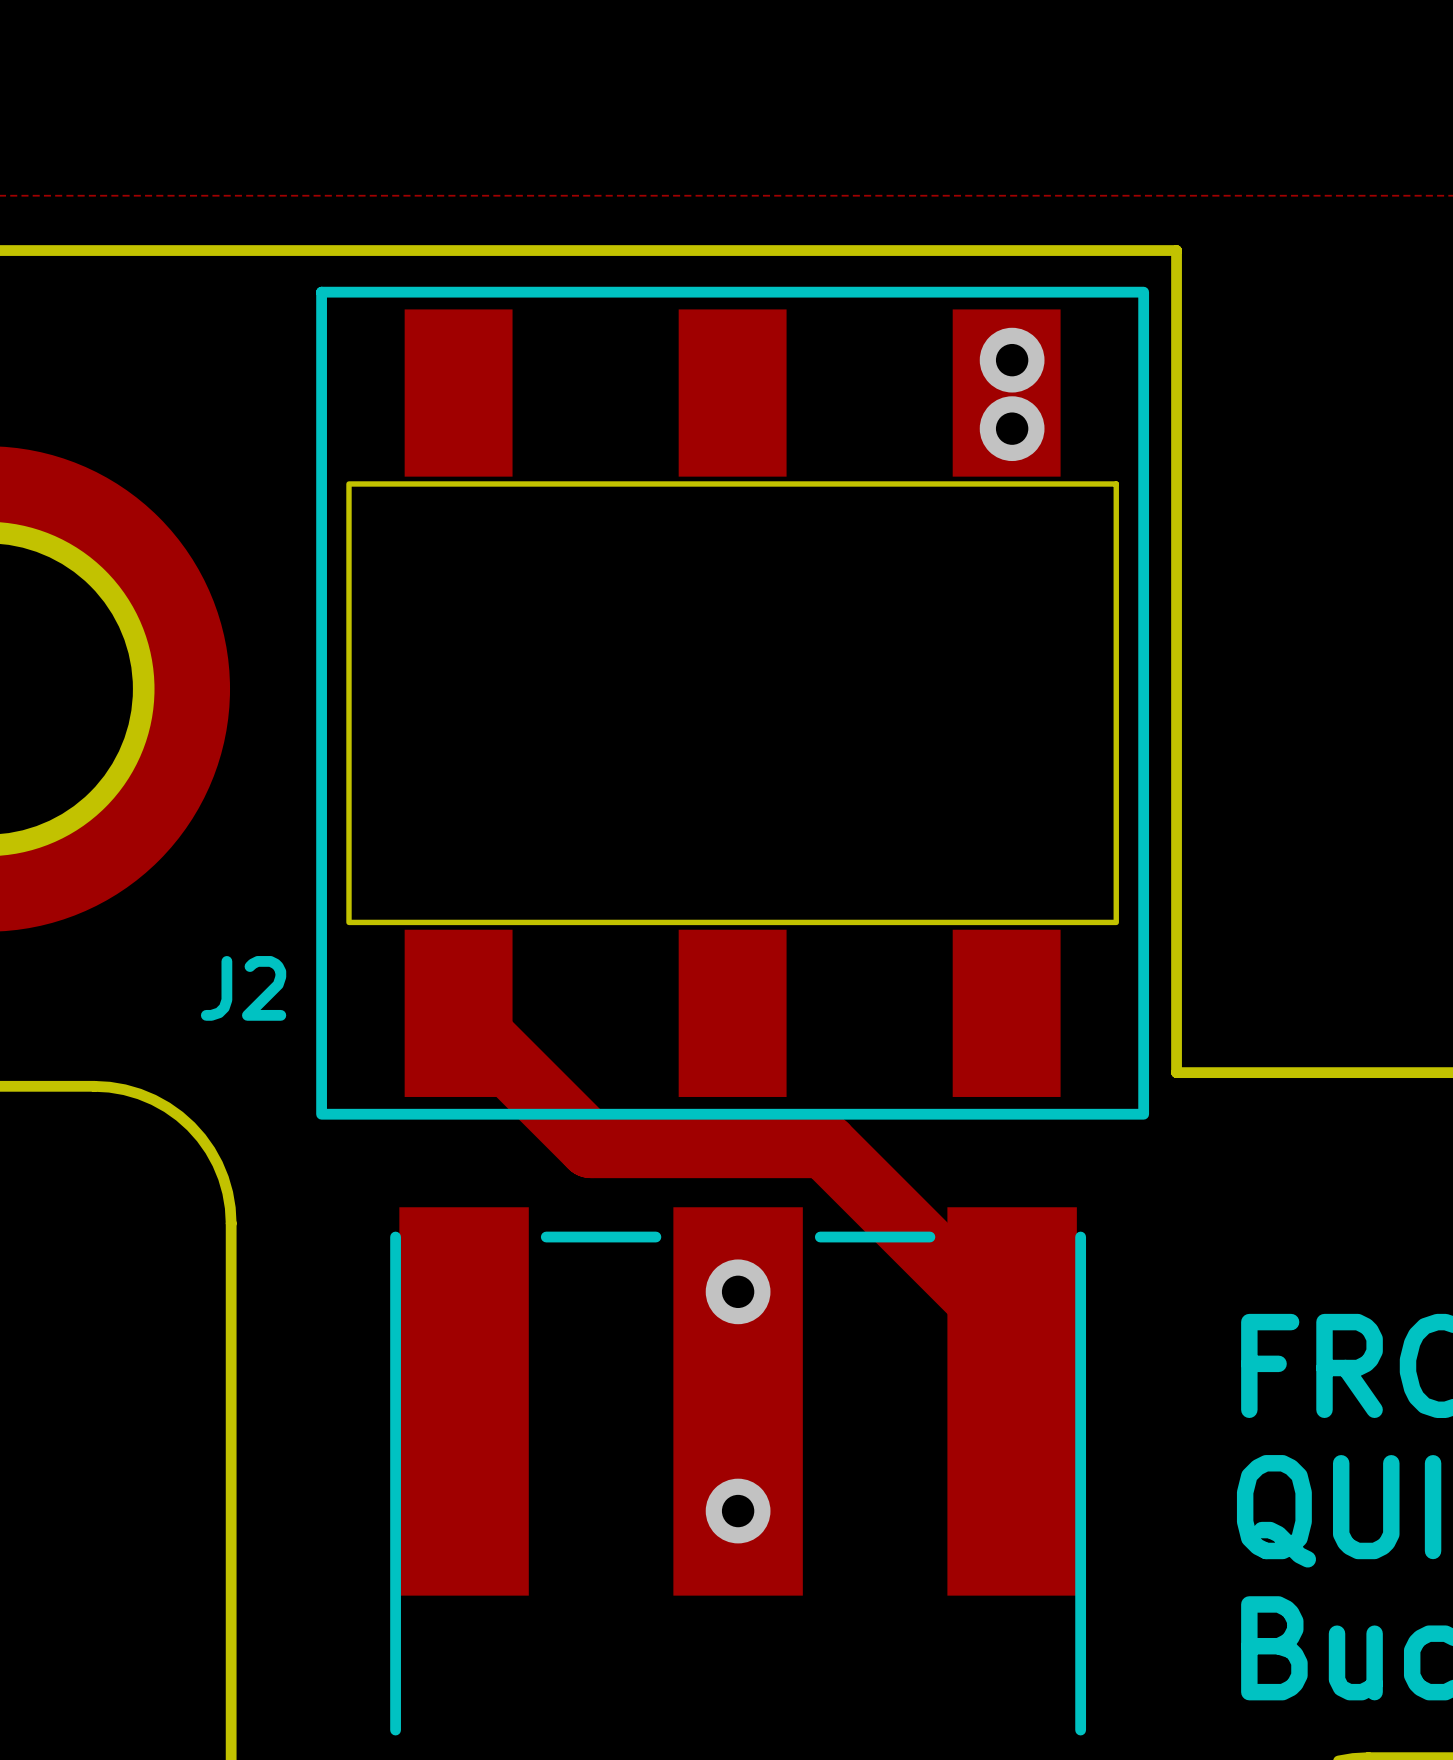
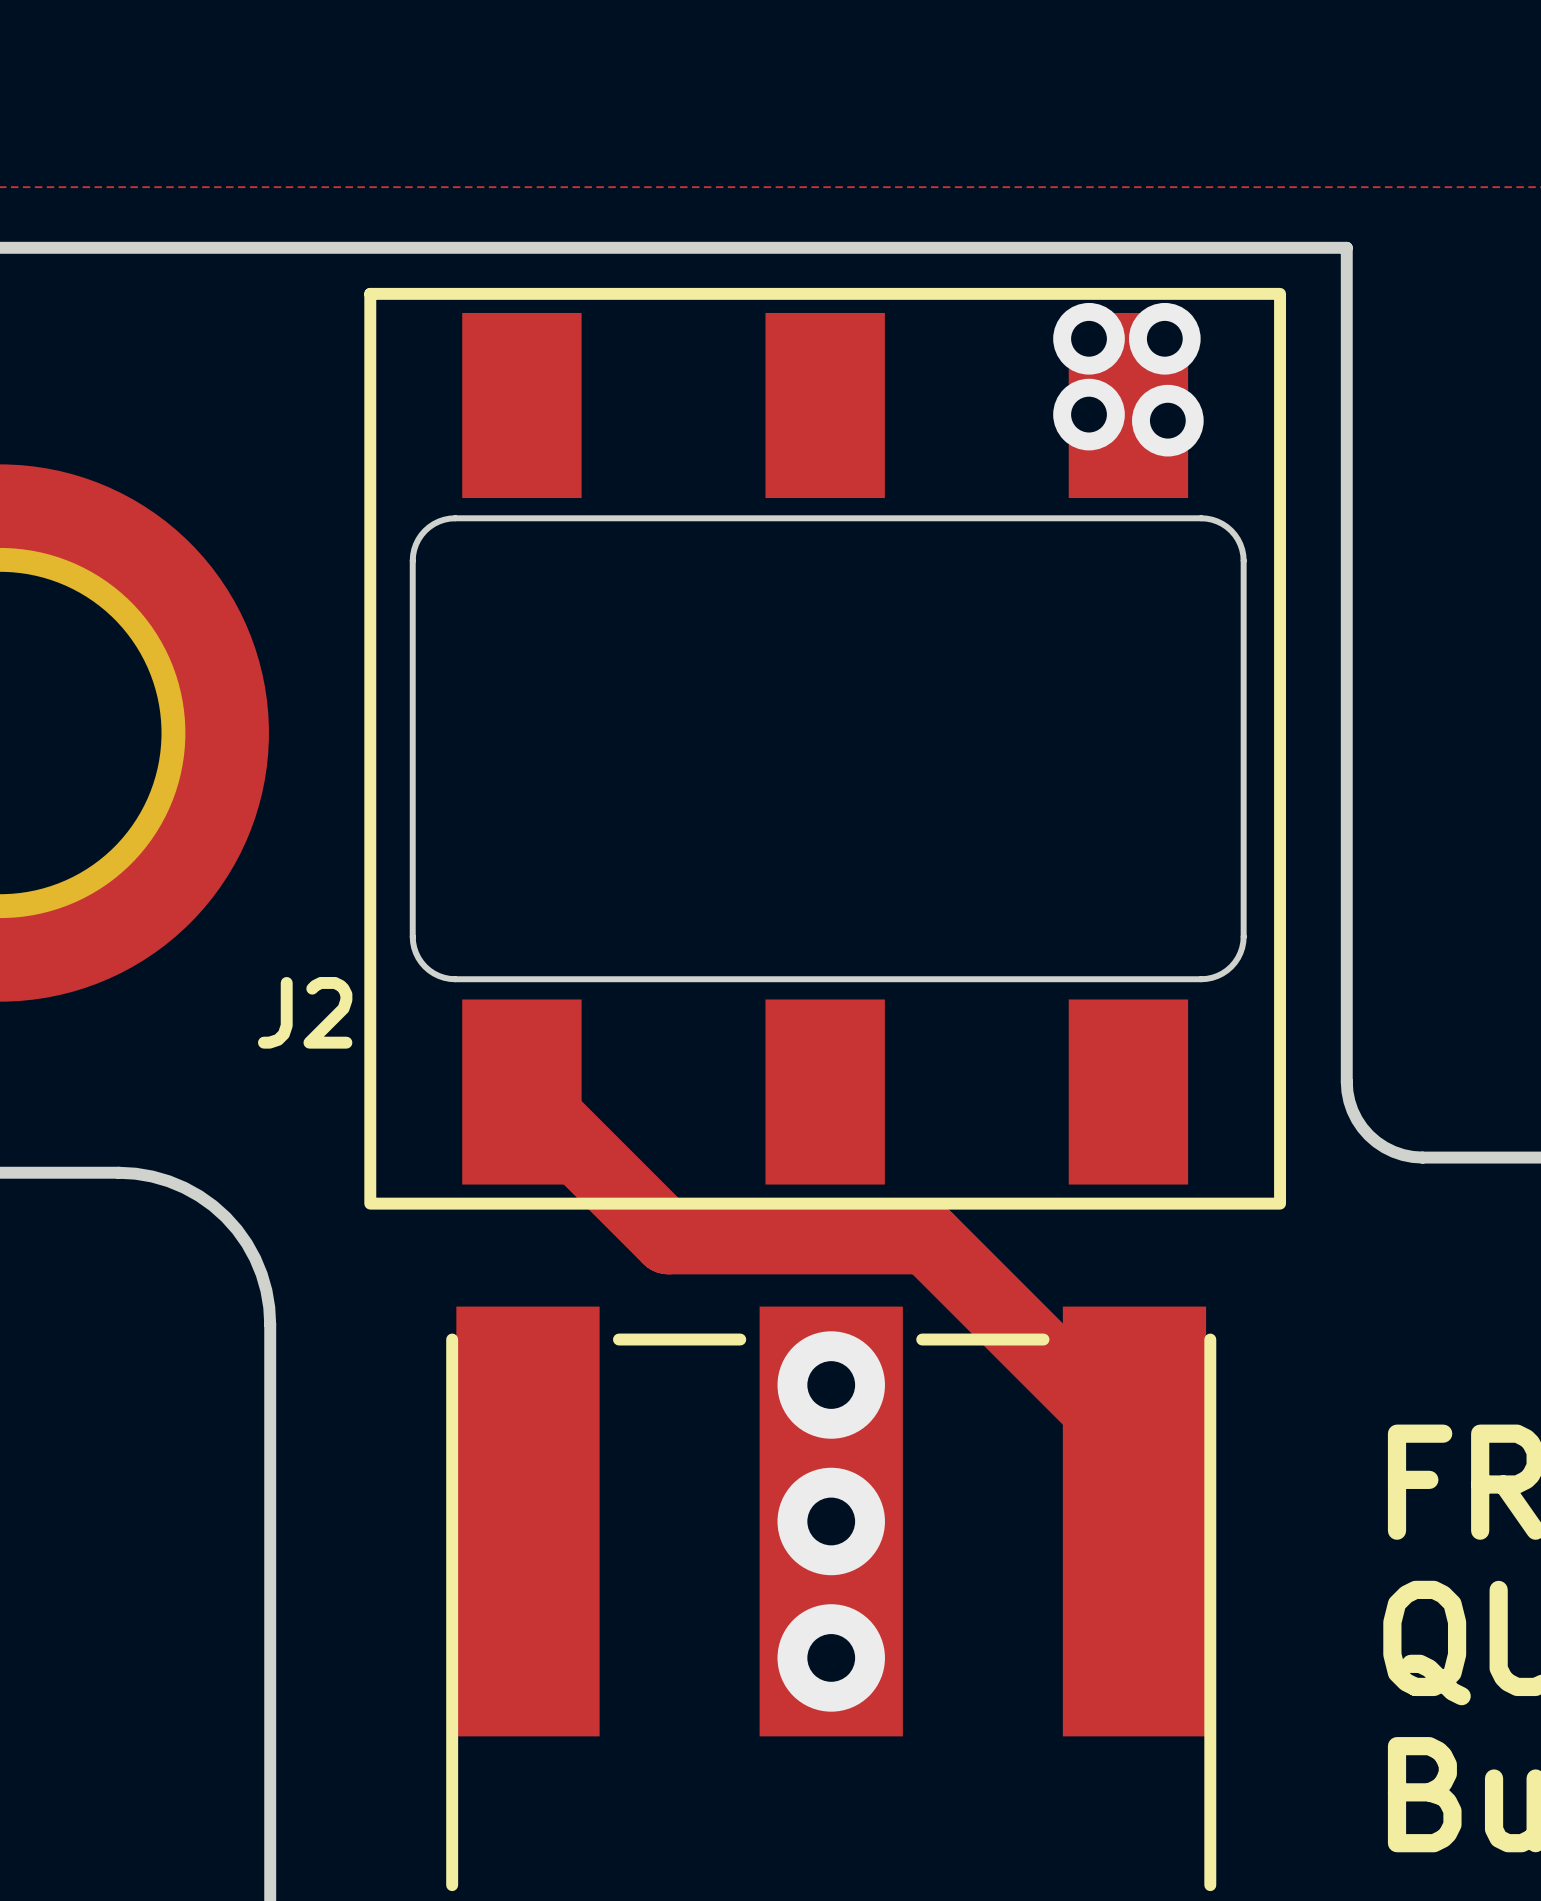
board edge: (1176, 250) (1176, 1072) (1272, 1072) -> (1316, 247) (1346, 247) (1347, 1091) (1352, 1110) (1368, 1135) (1393, 1151) (1422, 1157)
J2 footprint: [316, 286, 1150, 1120] -> [364, 287, 1287, 1210]
via: none -> (1089, 338)
via: none -> (1164, 338)
via: (1012, 360) -> none
via: none -> (1089, 414)
via: none -> (1167, 420)
via: (1012, 428) -> none
J2 name position: J2 (243, 988) -> J2 (305, 1012)
via size: [705, 1259, 771, 1325] -> [777, 1331, 885, 1439]
via: none -> (831, 1521)
via size: [705, 1478, 771, 1544] -> [777, 1604, 885, 1712]

